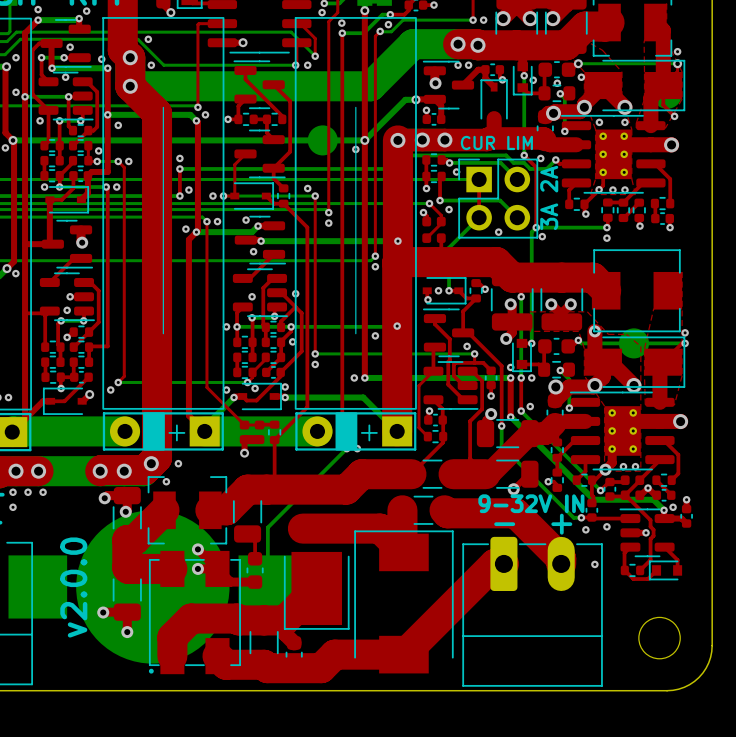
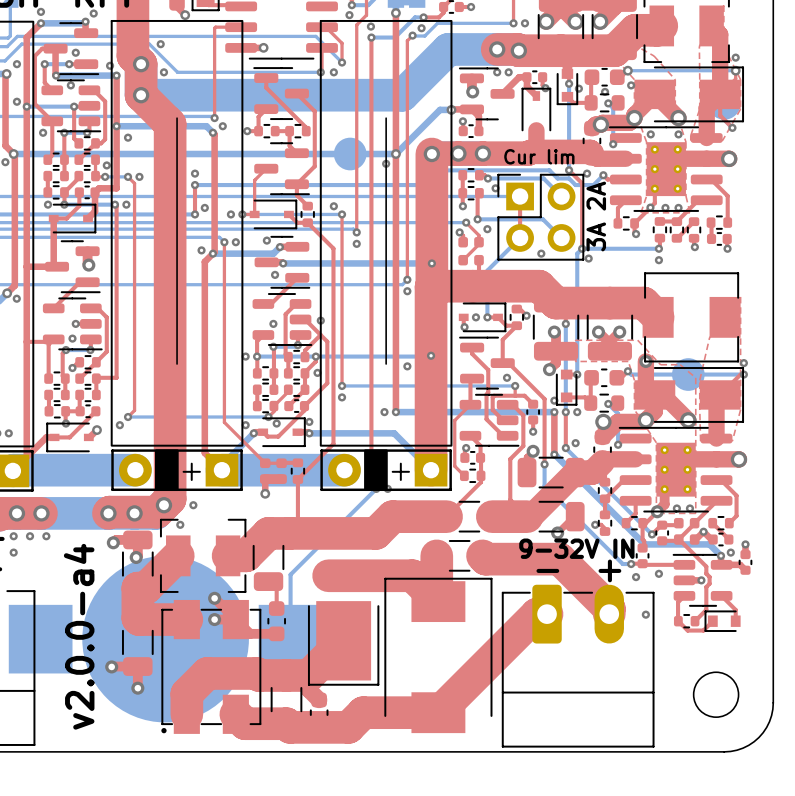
text: CUR LIM (496, 142) -> Cur lim (539, 156)
text: v2.0.0 (73, 587) -> v2.0.0-a4 (79, 636)

